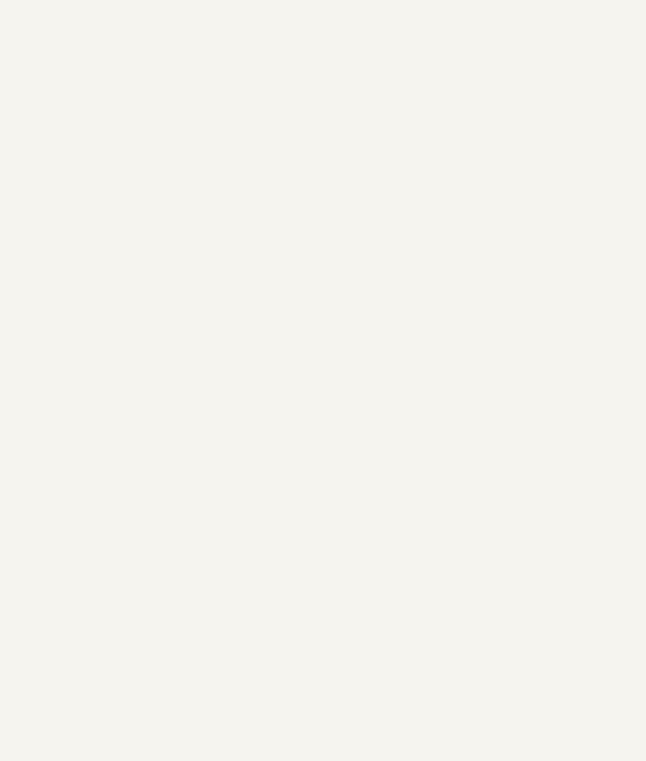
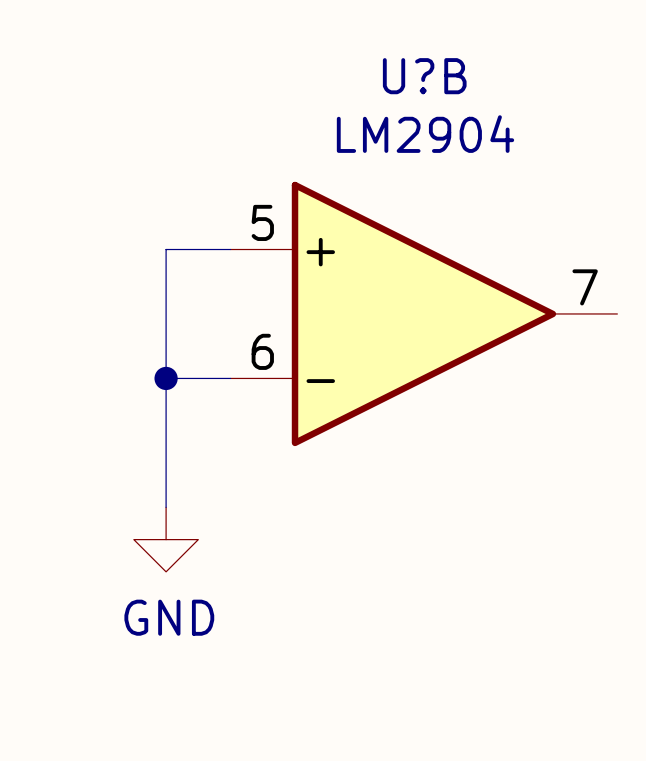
wire: none -> (230, 249) (166, 249) (166, 507)
U?B: none -> LM2904 (423, 313)
wire: none -> (166, 378) (230, 378)
junction: none -> (166, 378)
power symbol: none -> GND (166, 539)

